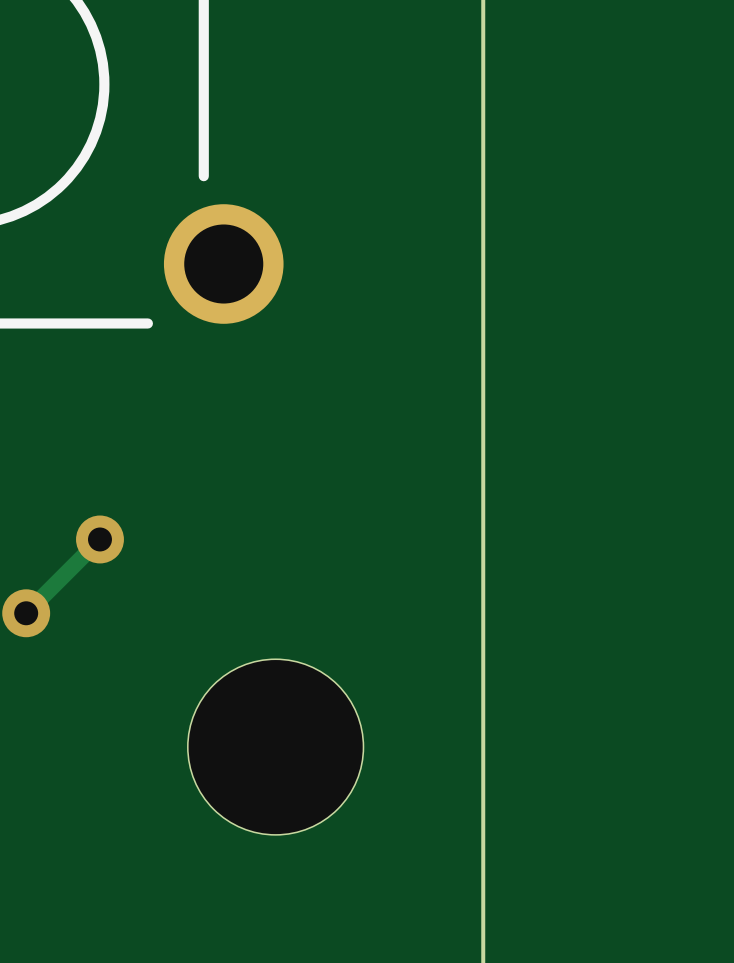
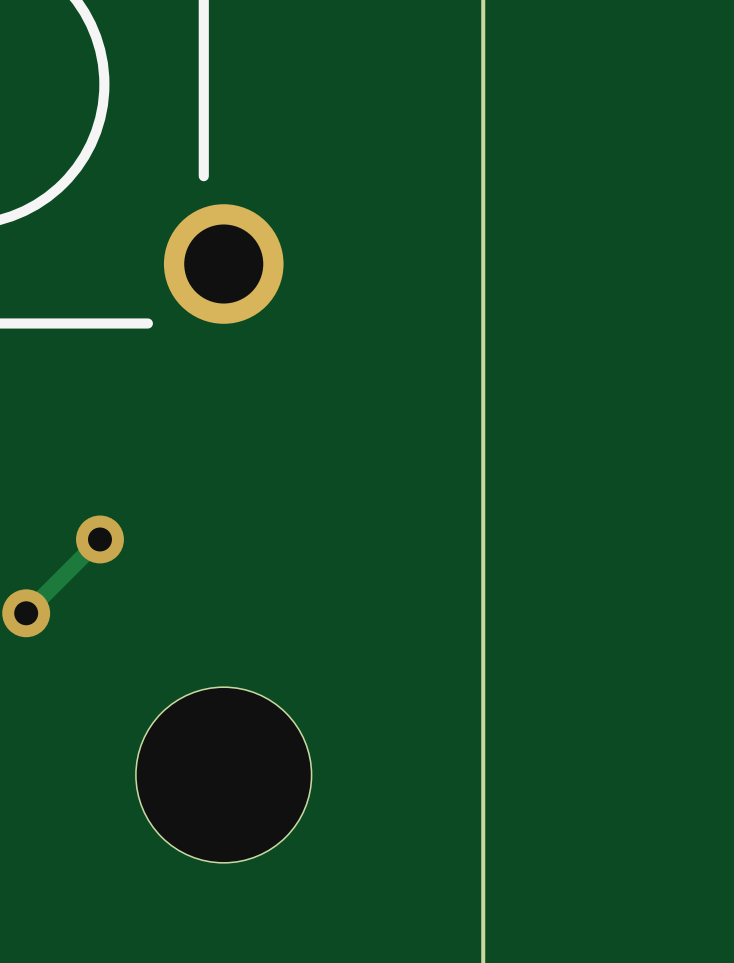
part position: (275, 747) -> (223, 775)

